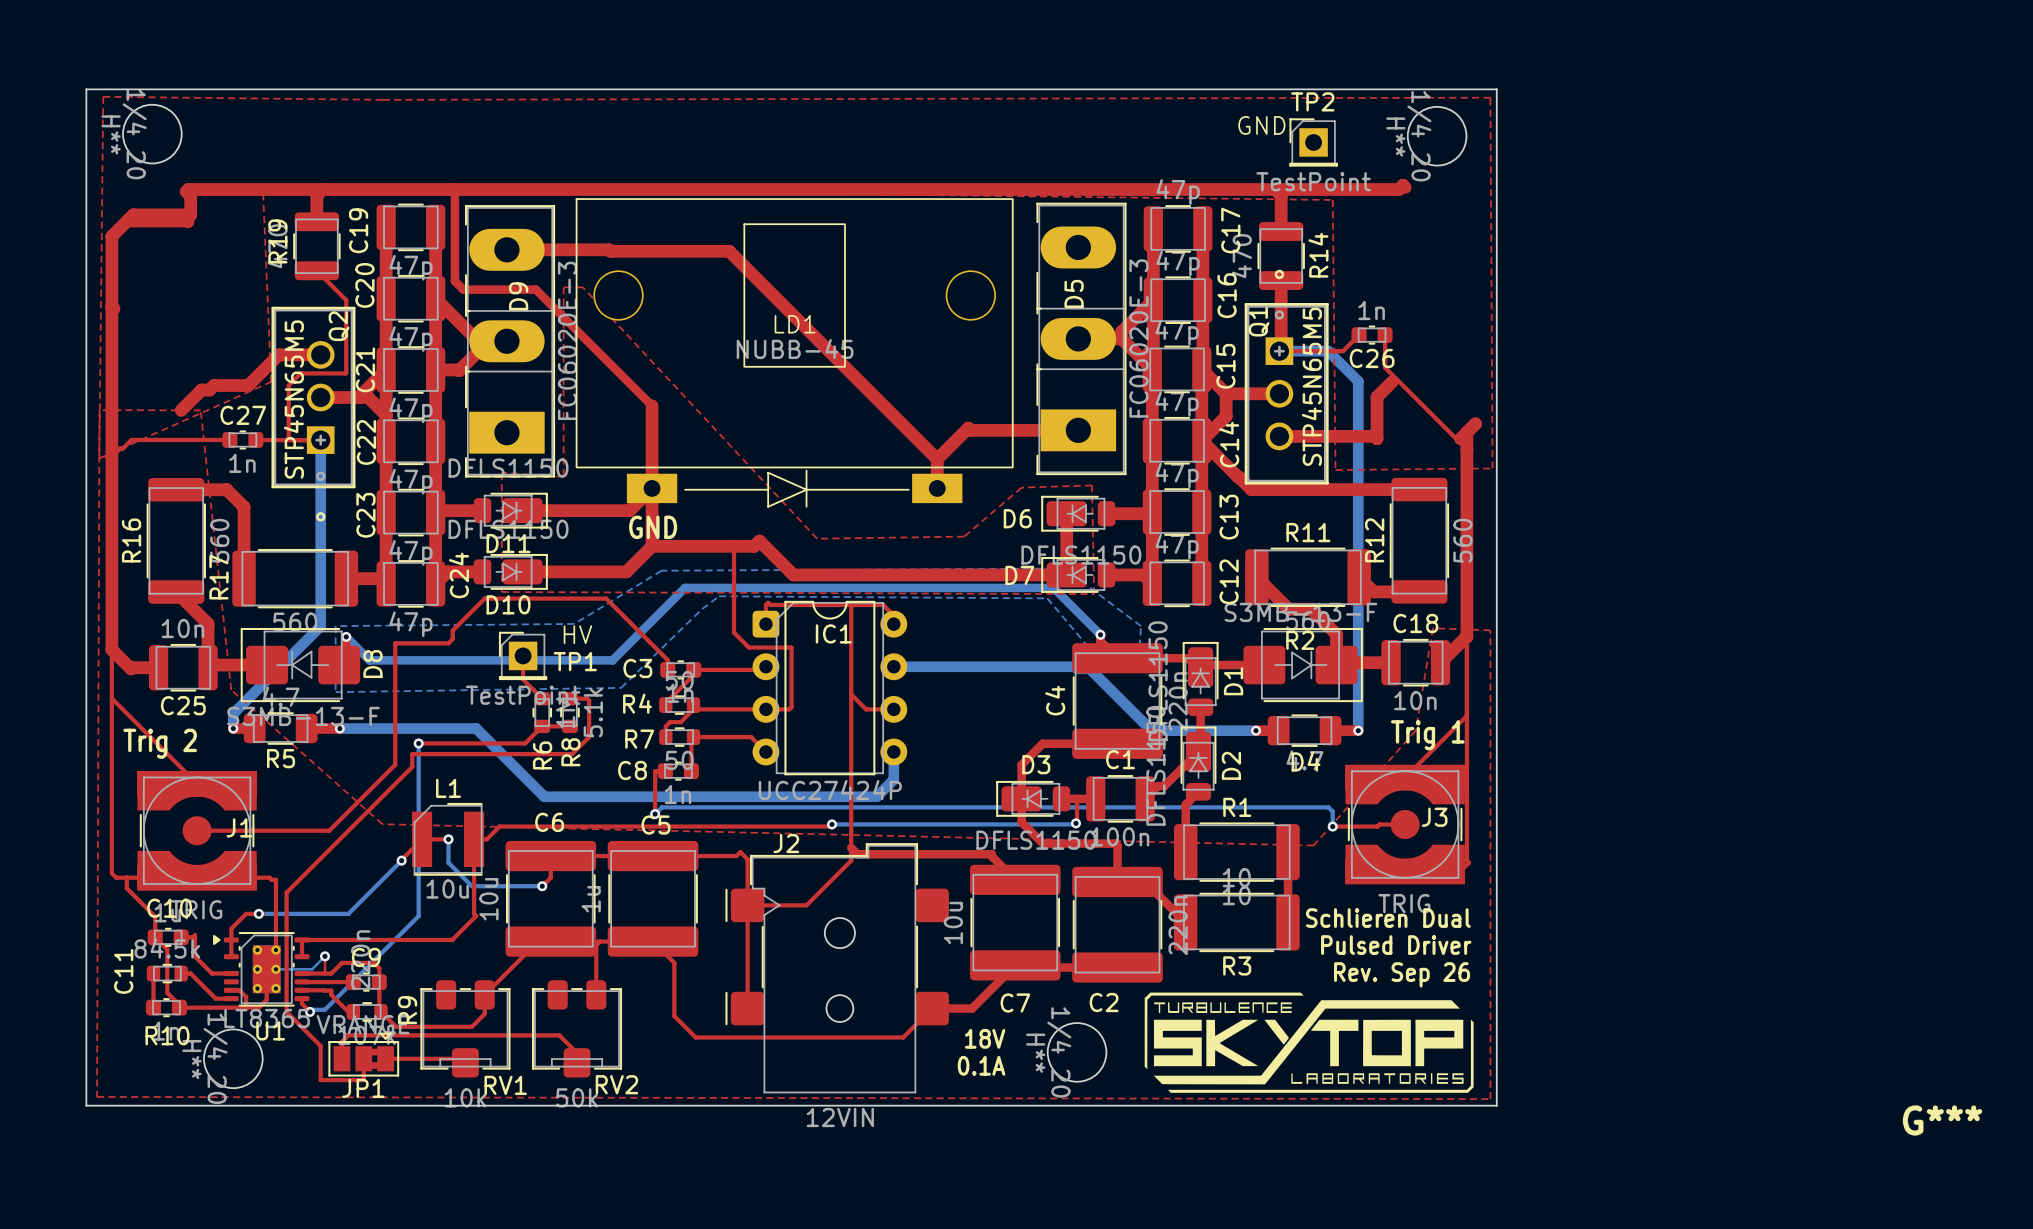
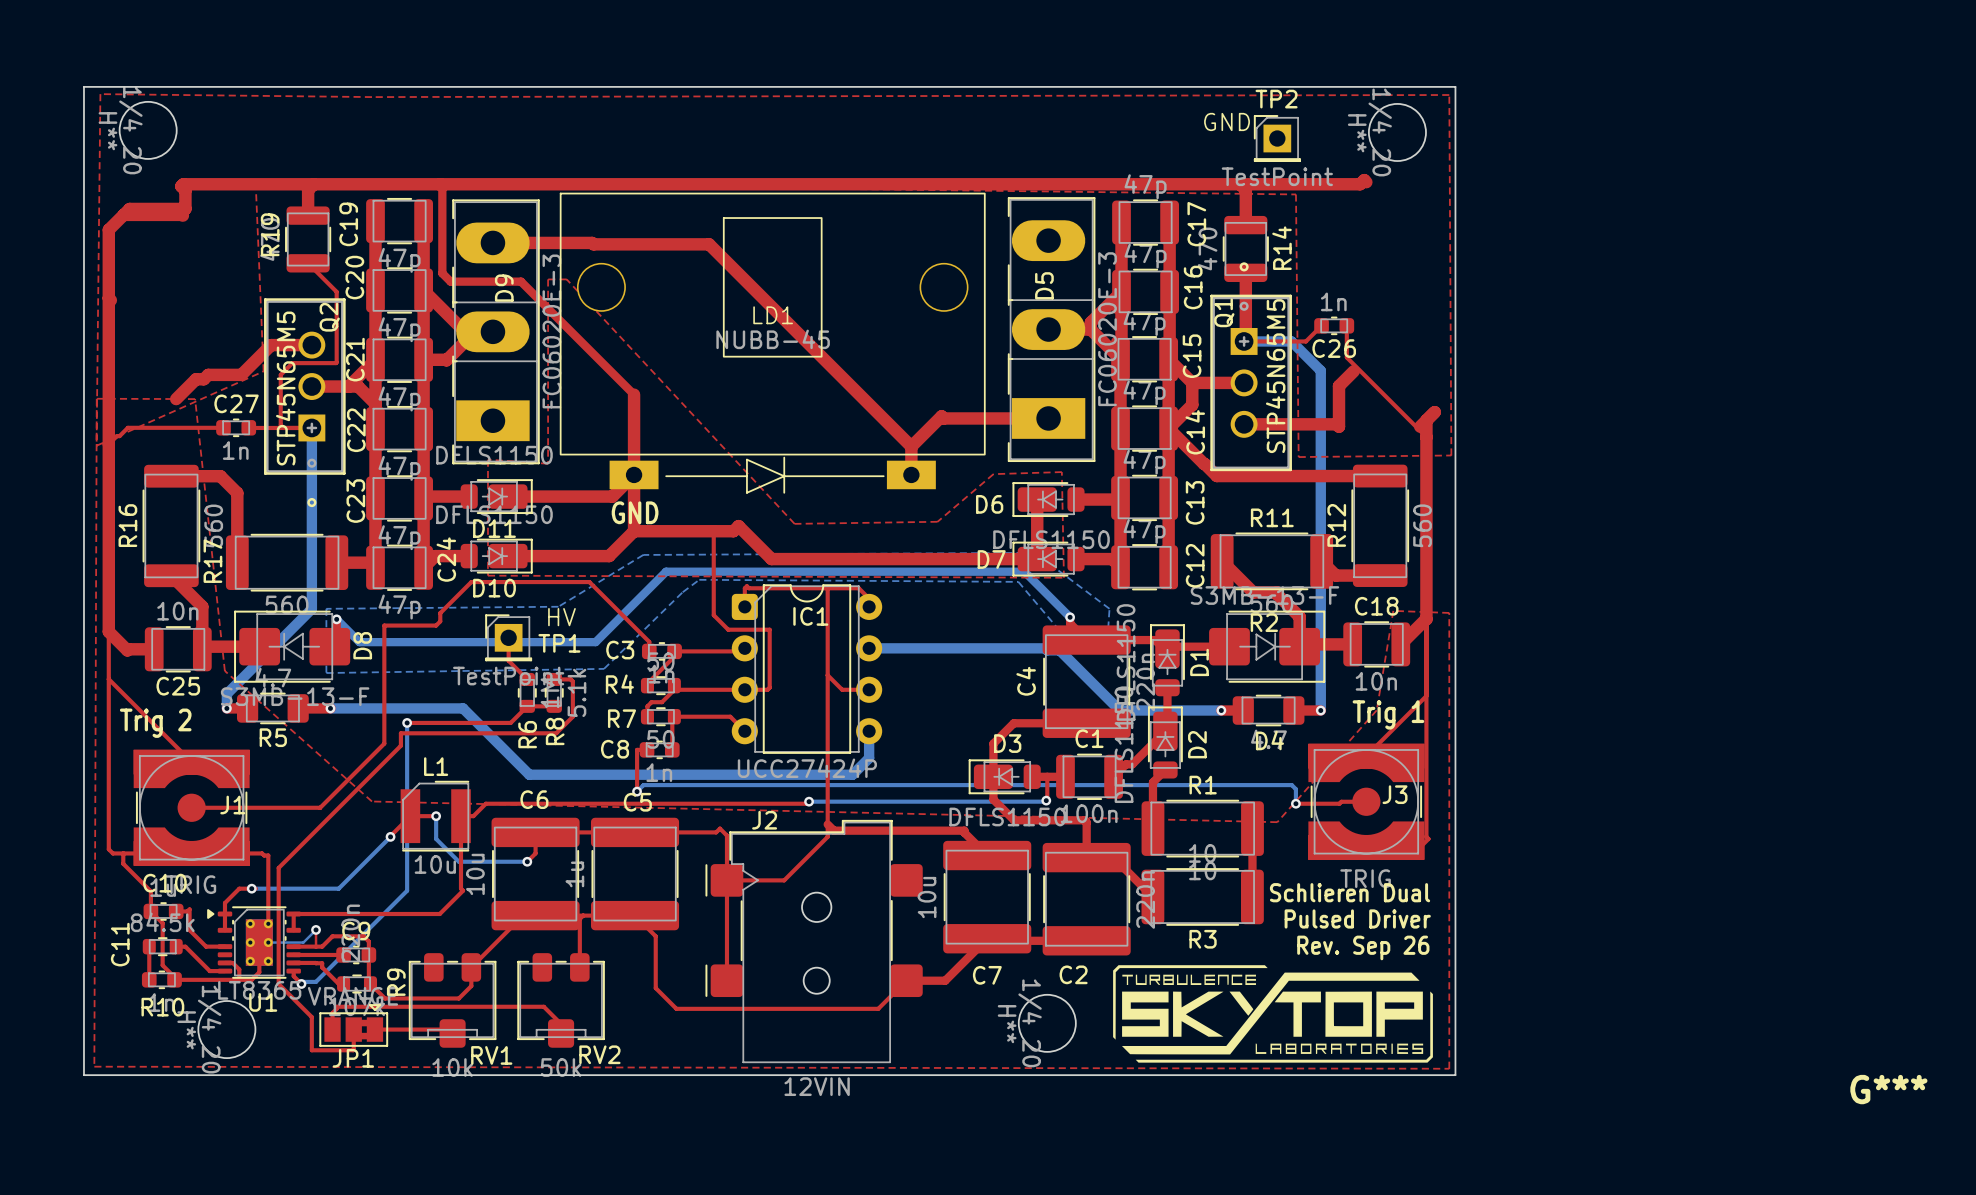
text: 18V (985, 1038) -> none
text: 0.1A (981, 1065) -> none

